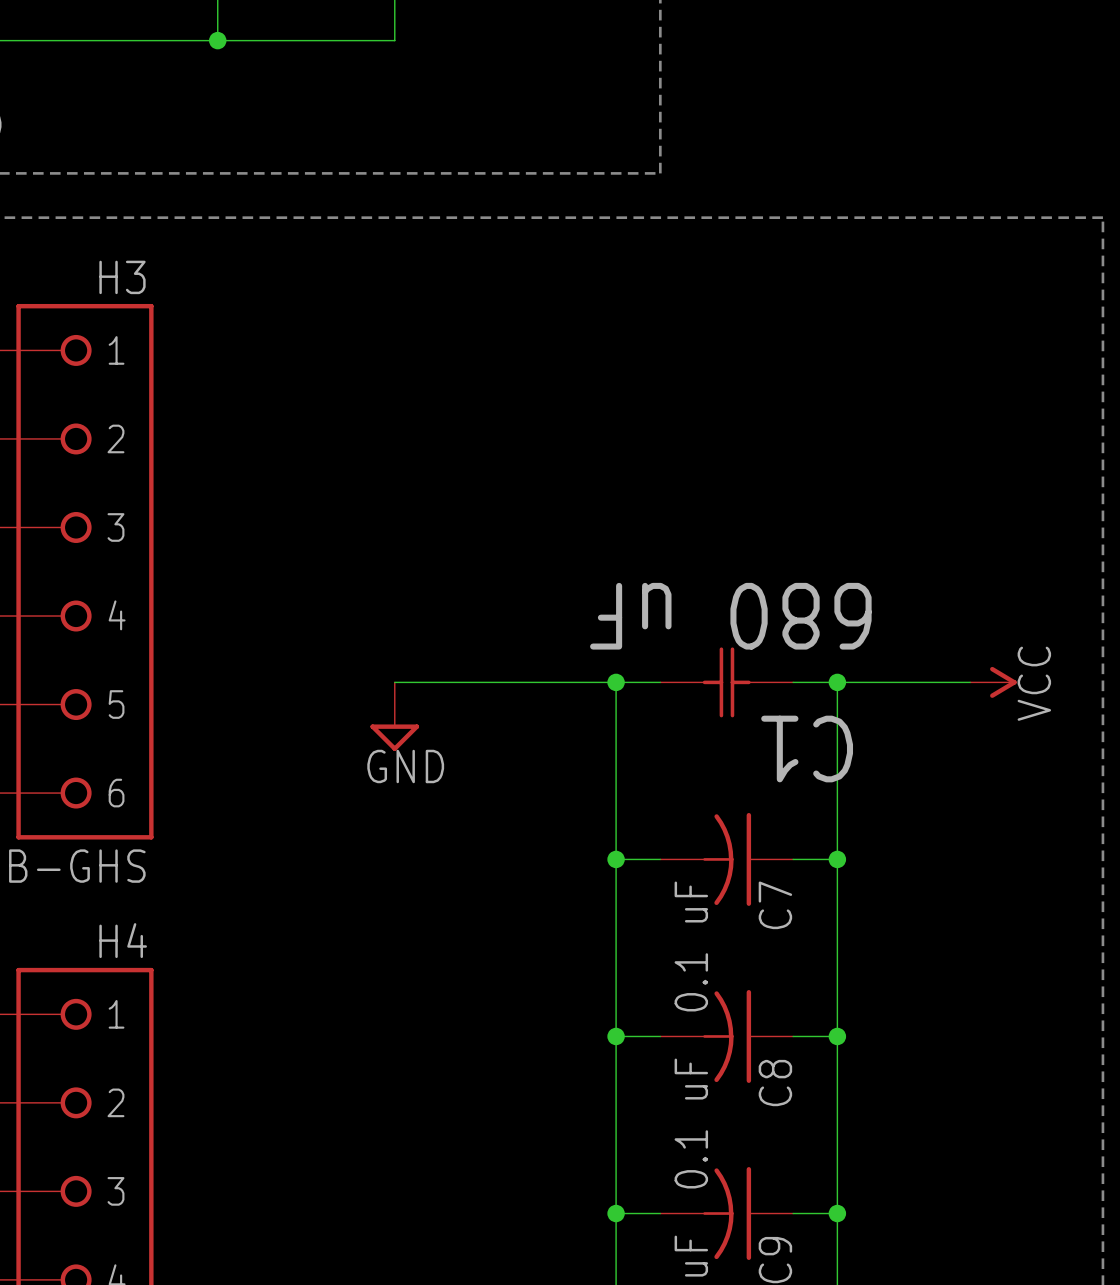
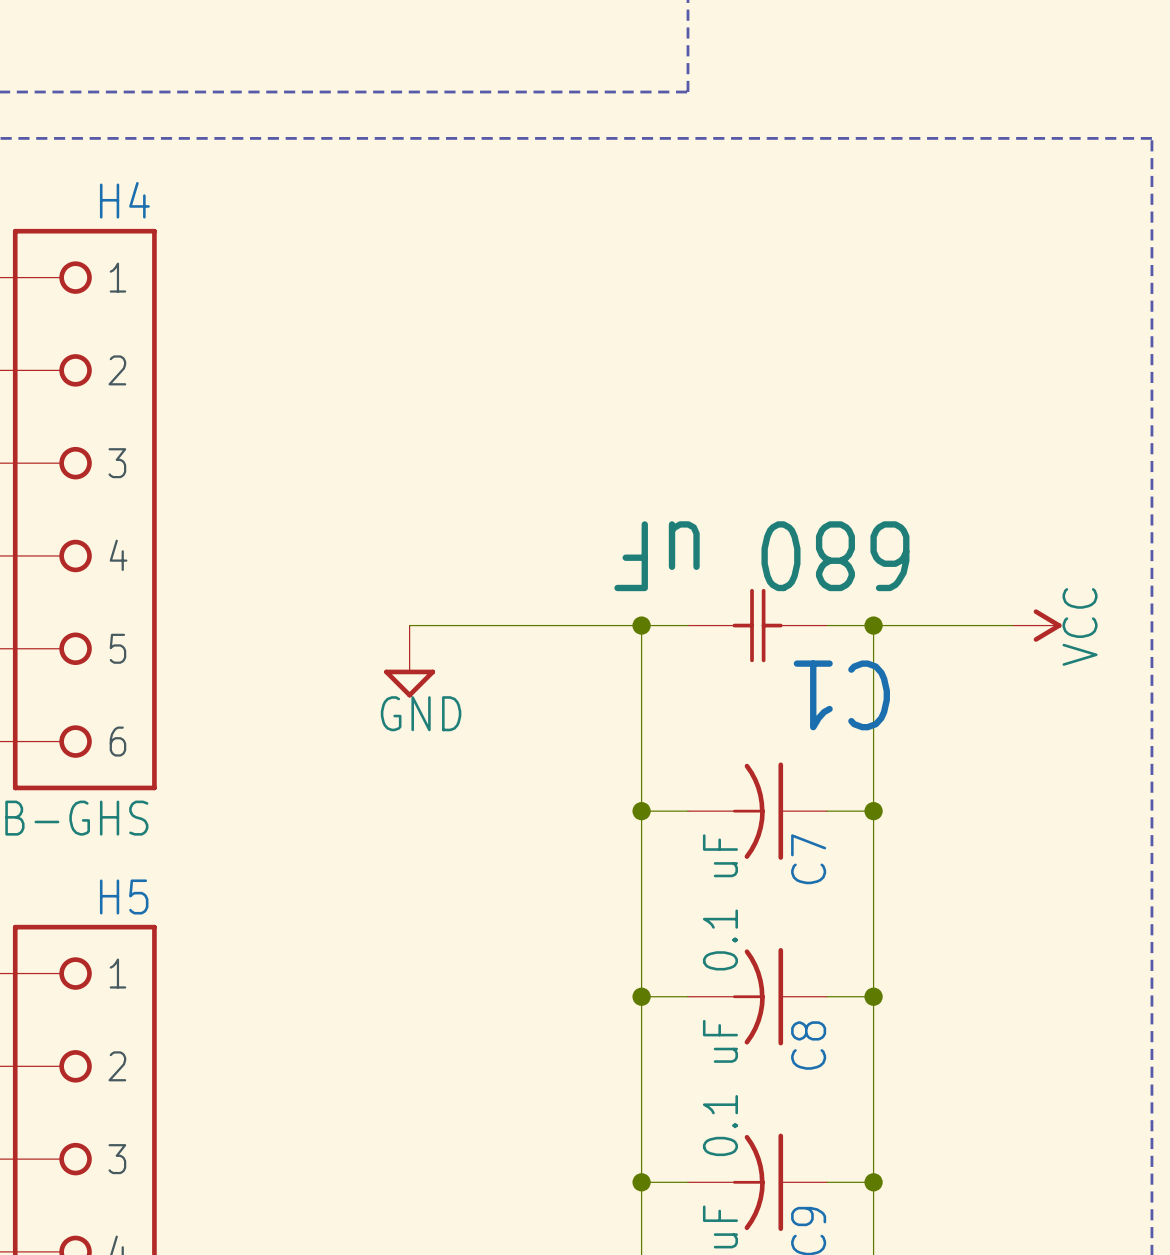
H3 name: H3 (122, 277) -> H4 (124, 200)
H4 name: H4 (123, 940) -> H5 (124, 896)

